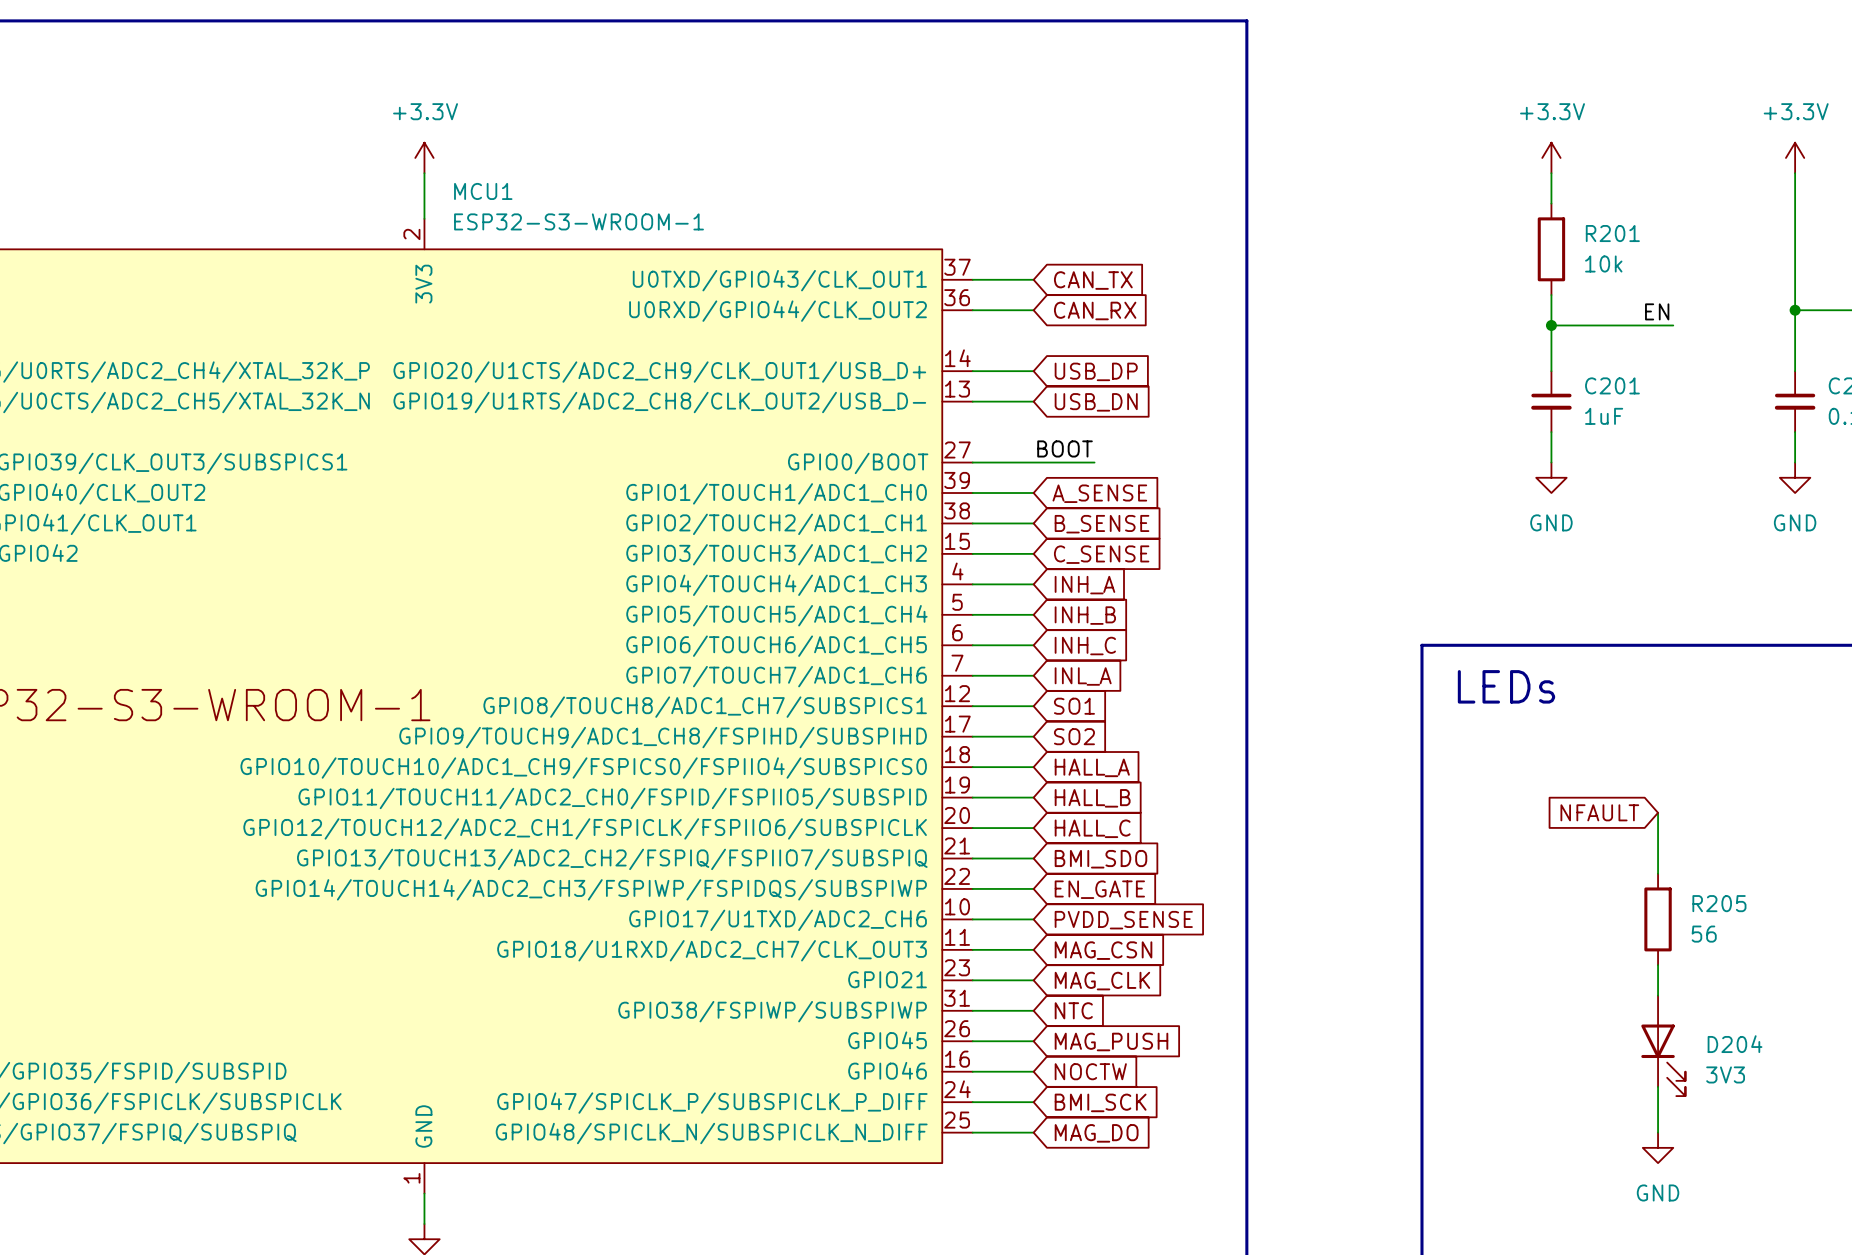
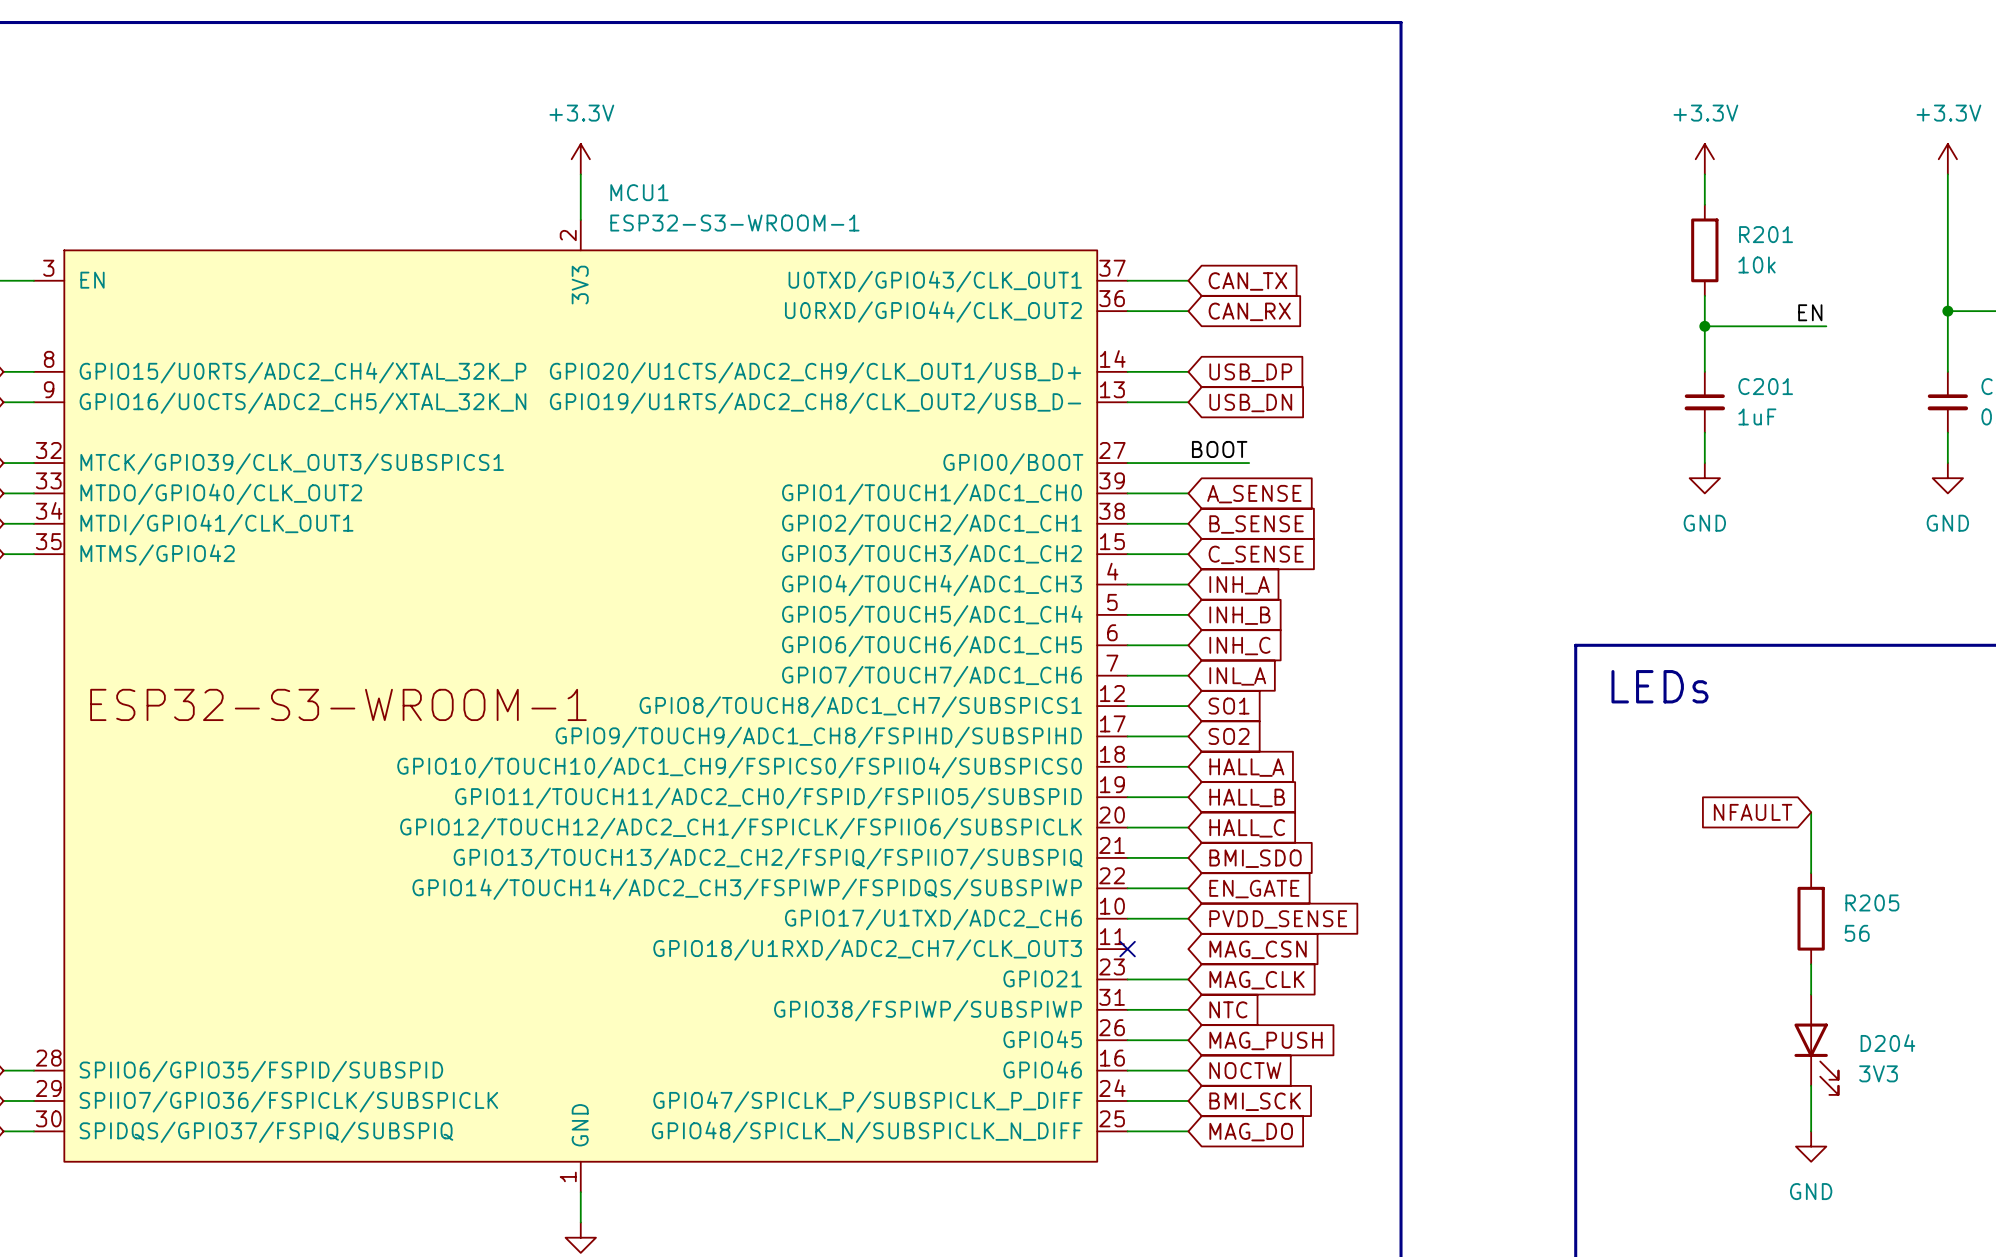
wire: (972, 949) (1033, 949) -> none
no-connect mark: none -> (1127, 949)

